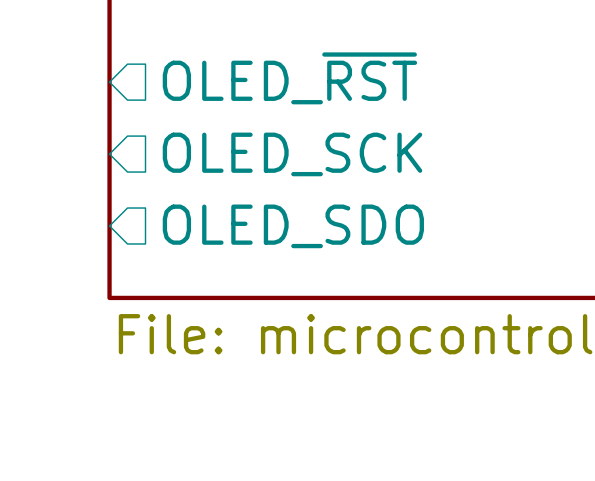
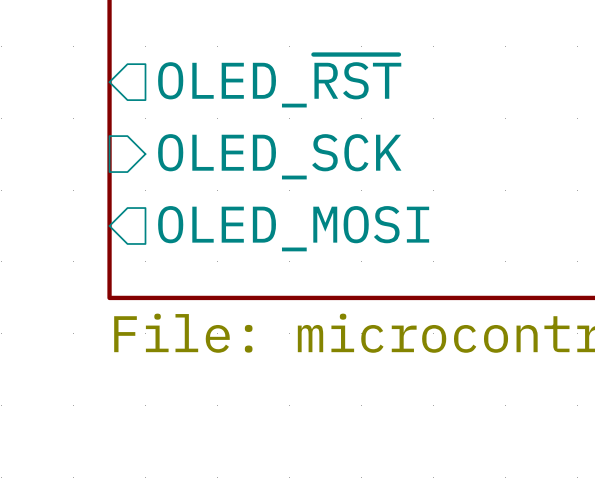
sheet pin shape: output (292, 154) -> input (279, 156)
sheet pin: OLED_SDO (293, 226) -> OLED_MOSI (293, 228)

